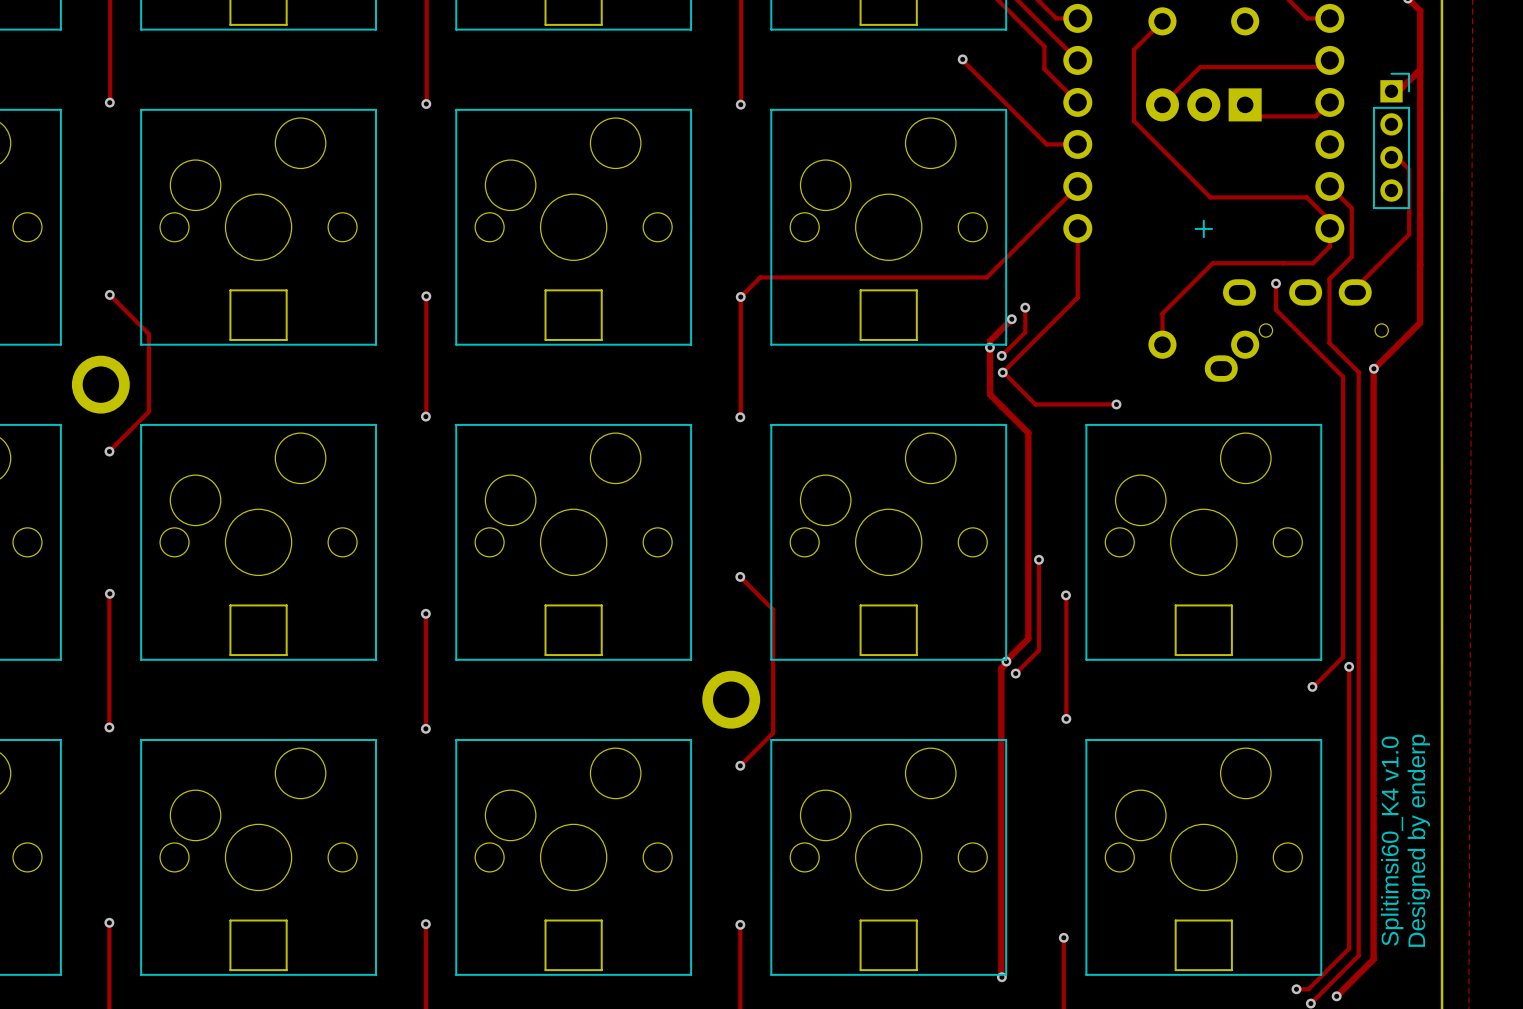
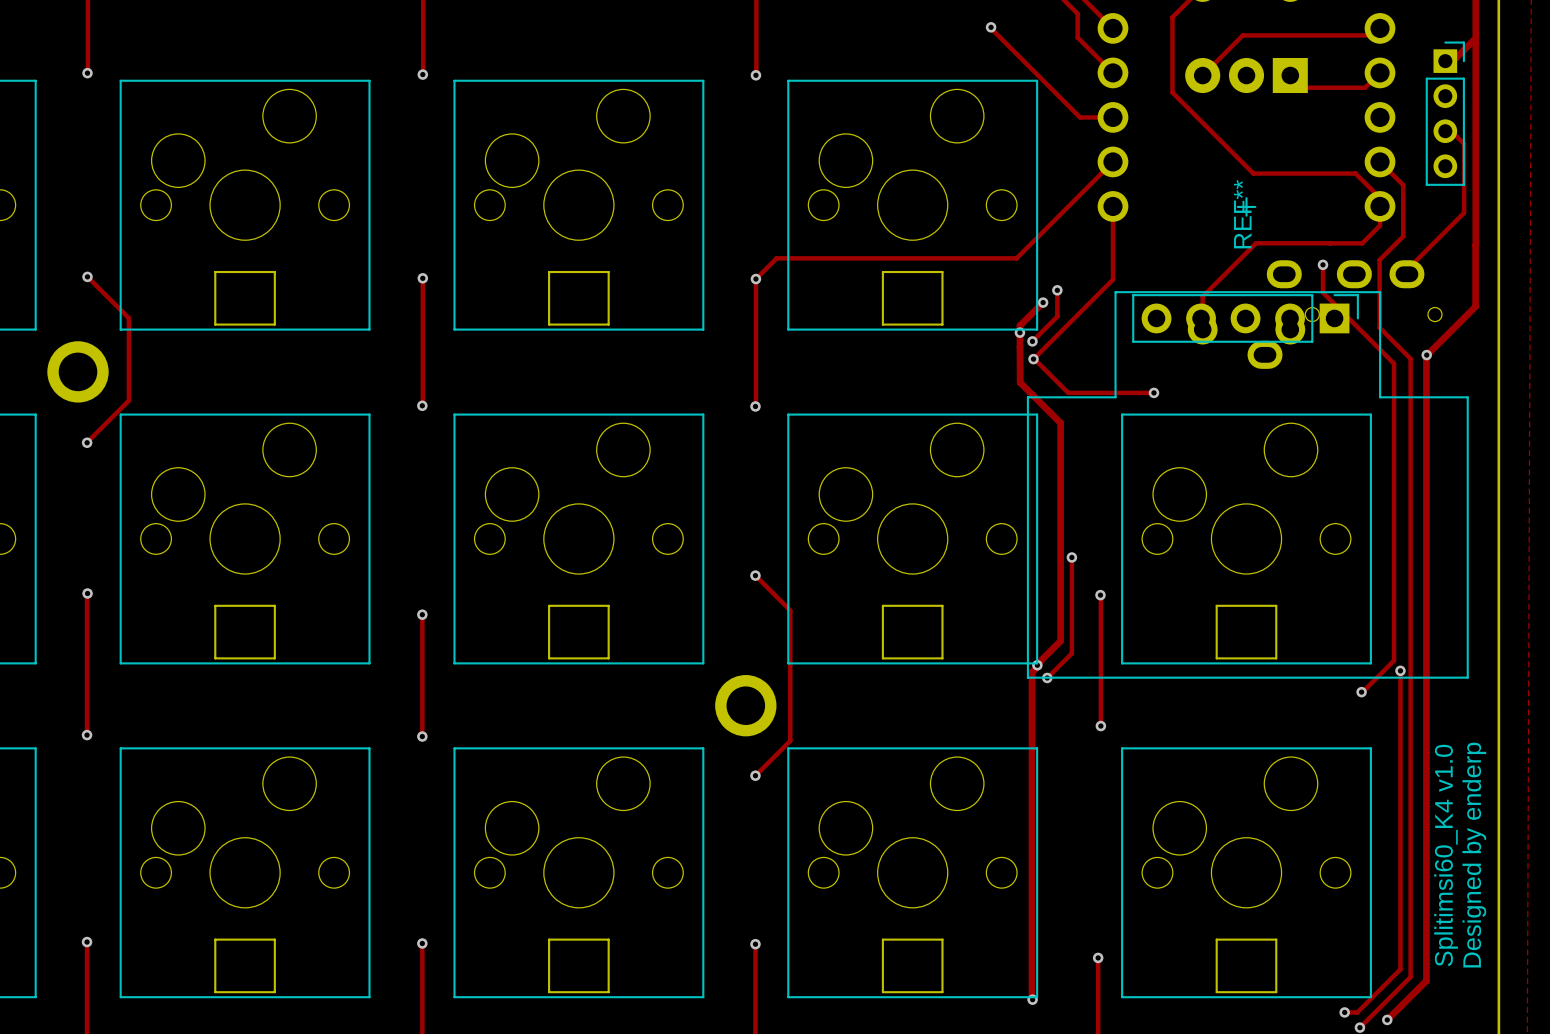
REF**: none -> (1247, 484)

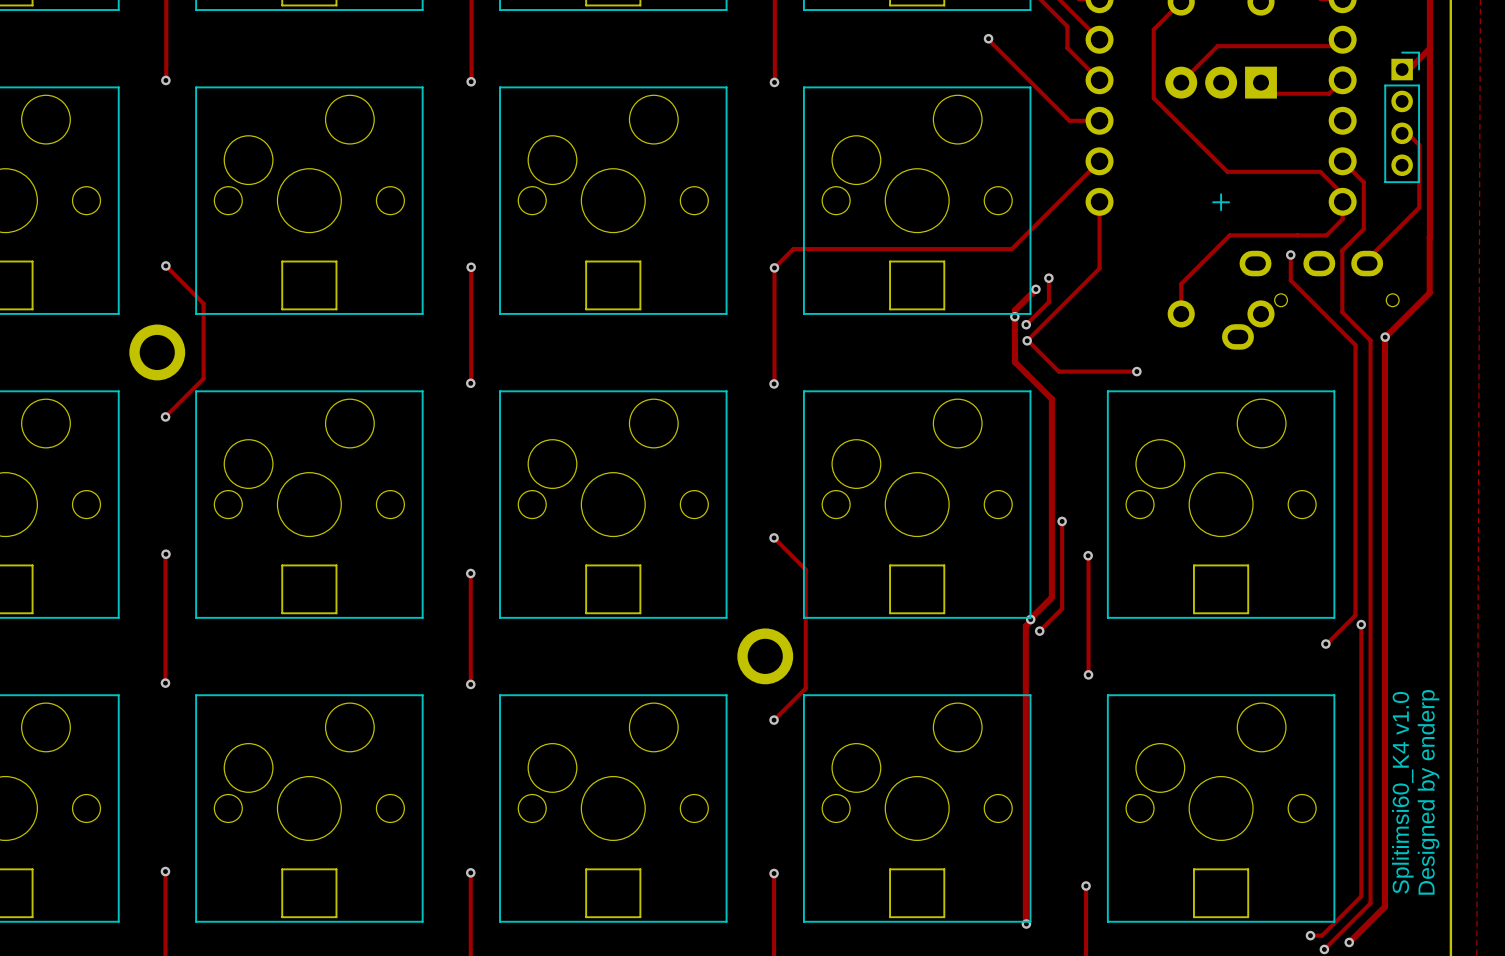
REF**: (1247, 484) -> none

